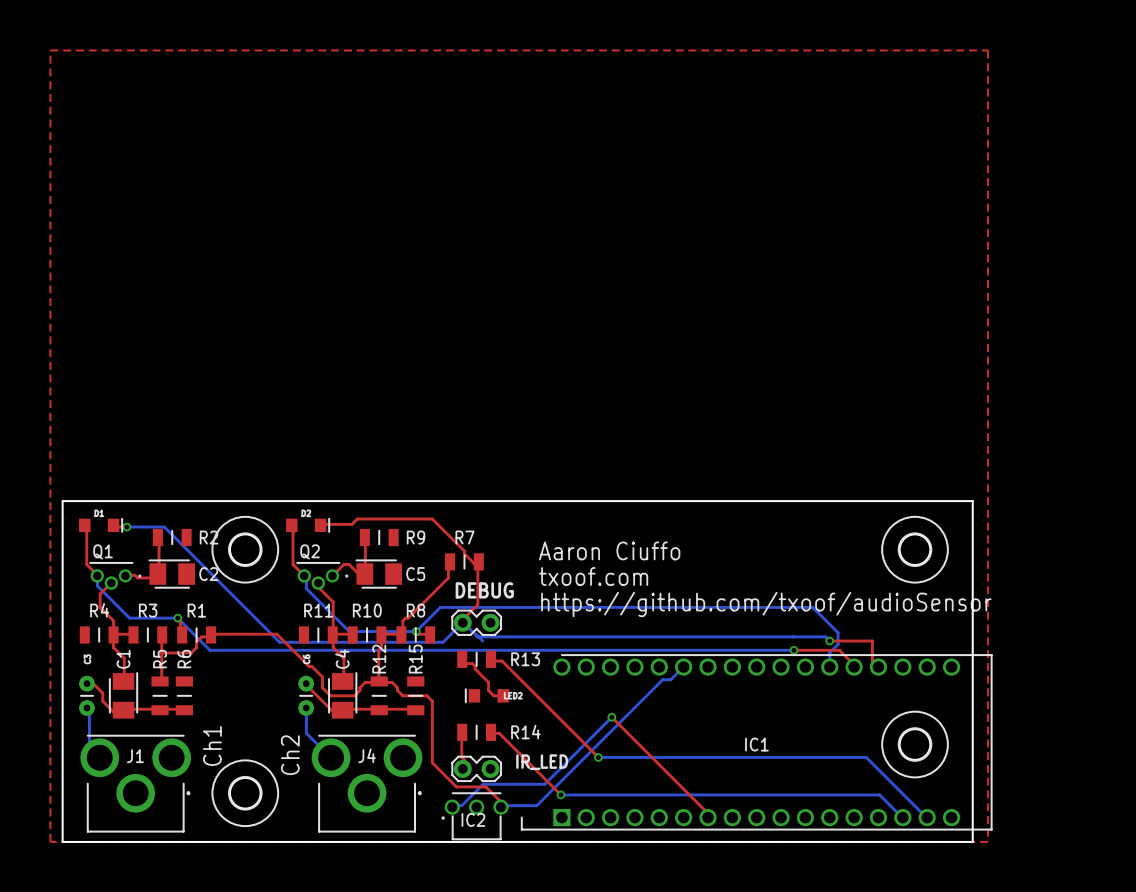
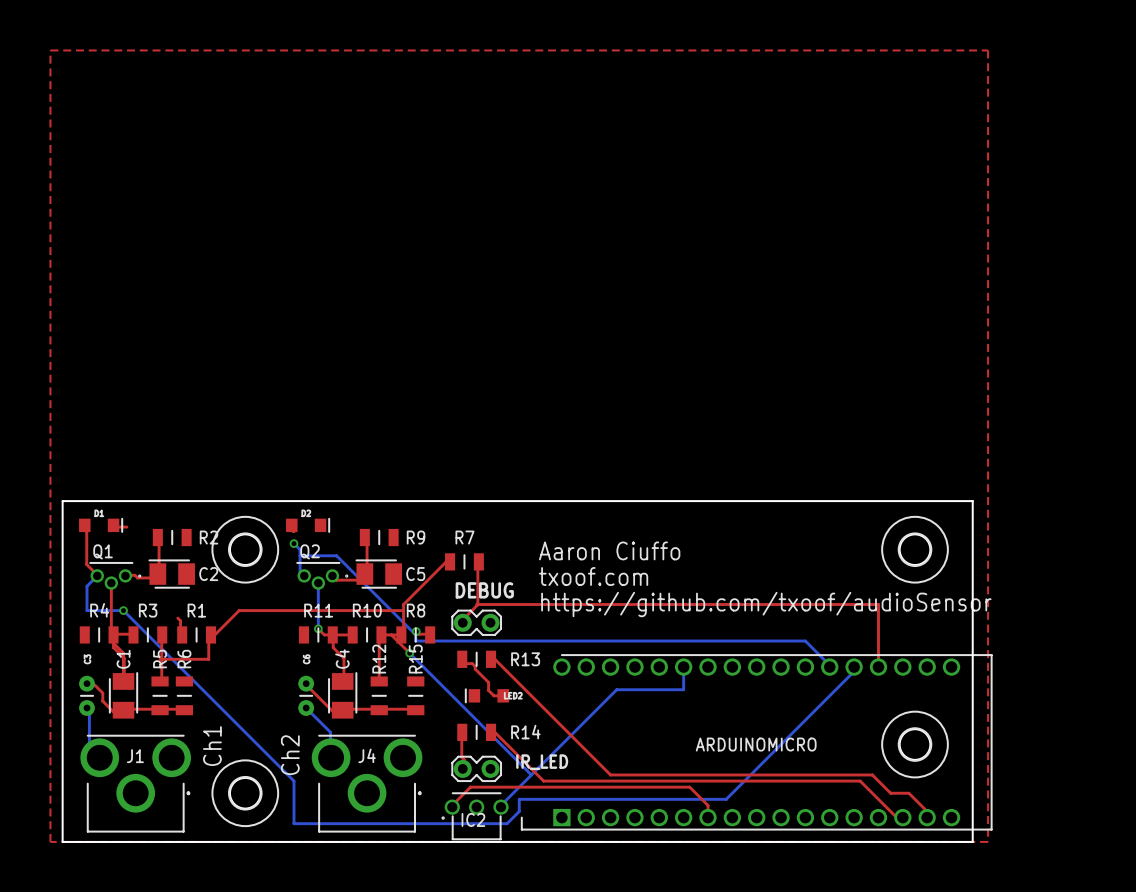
top track: (322, 524) (351, 524) (357, 519) (432, 519) (464, 551) (464, 553) (475, 564) (477, 564) -> none
bottom track: (126, 527) (164, 527) (279, 642) (443, 642) (462, 622) (477, 636) (825, 636) (829, 641) -> none
via: (126, 527) -> none
top track: (293, 527) (293, 564) (304, 575) -> none
top track: (364, 537) (364, 574) (357, 572) (349, 564) (343, 564) (332, 575) -> (364, 537) (367, 537) (367, 574) (360, 580) (336, 580) (332, 575)
bottom track: none -> (294, 543) (300, 549) (300, 574) (304, 575)
via: none -> (294, 543)
top track: (448, 561) (448, 577) (408, 618) (402, 620) (402, 634) (381, 634) (381, 647) (378, 650) (379, 681) -> (448, 561) (446, 561) (403, 604) (403, 634) (379, 634) (379, 681)
bottom track: (97, 575) (97, 585) (129, 618) (177, 618) (209, 650) (793, 650) -> (97, 575) (86, 586) (86, 610) (123, 610) (294, 781) (294, 823) (507, 823) (519, 811) (519, 799) (726, 799) (854, 671) (854, 667)
bottom track: (304, 575) (306, 577) (306, 588) (349, 631) (416, 631) (440, 607) (812, 607) (838, 632) (838, 644) (829, 652) (829, 665) -> (300, 555) (336, 555) (415, 634) (415, 641) (805, 641) (829, 665)
top track: (111, 583) (100, 594) (100, 607) (113, 620) (113, 634) -> (111, 583) (111, 641) (123, 653) (123, 681)
top track: (318, 583) (319, 588) (333, 602) (333, 634) (352, 634) -> (318, 628) (324, 634) (352, 634)
bottom track: none -> (318, 583) (318, 628)
via: none -> (123, 610)
top track: none -> (403, 610) (239, 610) (214, 634) (208, 634) (208, 659) (160, 659)
via: (177, 618) -> none
via: none -> (318, 628)
top track: none -> (391, 634) (409, 653)
bottom track: (476, 635) (482, 641) -> none
top track: (829, 641) (872, 641) (872, 665) (878, 671) (878, 667) -> (476, 604) (878, 604) (878, 667)
via: (829, 641) -> none
top track: (793, 650) (839, 650) (852, 663) (852, 666) -> none
via: (793, 650) -> none
top track: (161, 652) (191, 652) (201, 636) (209, 636) (212, 634) (276, 634) (322, 677) (322, 687) (330, 695) (354, 695) (365, 682) (379, 681) -> none
bottom track: none -> (409, 653) (531, 774)
via: none -> (409, 653)
top track: (491, 659) (491, 661) (501, 661) (598, 757) -> (491, 659) (494, 659) (610, 774) (872, 774) (890, 793) (908, 793) (927, 811) (927, 817)
bottom track: (683, 667) (670, 679) (662, 679) (536, 805) (501, 807) -> (683, 667) (683, 689) (616, 689) (501, 807)
top track: (379, 681) (392, 682) (402, 695) (426, 695) (432, 701) (432, 762) (456, 786) (485, 786) (499, 800) (501, 807) -> none
bottom track: (306, 708) (306, 733) (331, 757) -> (306, 708) (330, 732) (331, 757)
top track: (611, 717) (705, 811) (705, 816) (708, 817) -> (452, 807) (470, 787) (689, 787) (708, 805) (708, 817)
bottom track: (611, 717) (544, 784) (483, 784) (461, 805) (452, 807) -> none
via: (611, 717) -> none
top track: (491, 732) (499, 733) (560, 794) -> (491, 732) (494, 732) (543, 781) (860, 781) (896, 817) (902, 817)
IC1 name: IC1 (756, 744) -> ARDUINOMICRO (756, 744)
bottom track: (598, 757) (866, 757) (927, 817) -> none
via: (598, 757) -> none
bottom track: (560, 794) (879, 794) (902, 817) -> none
via: (560, 794) -> none

